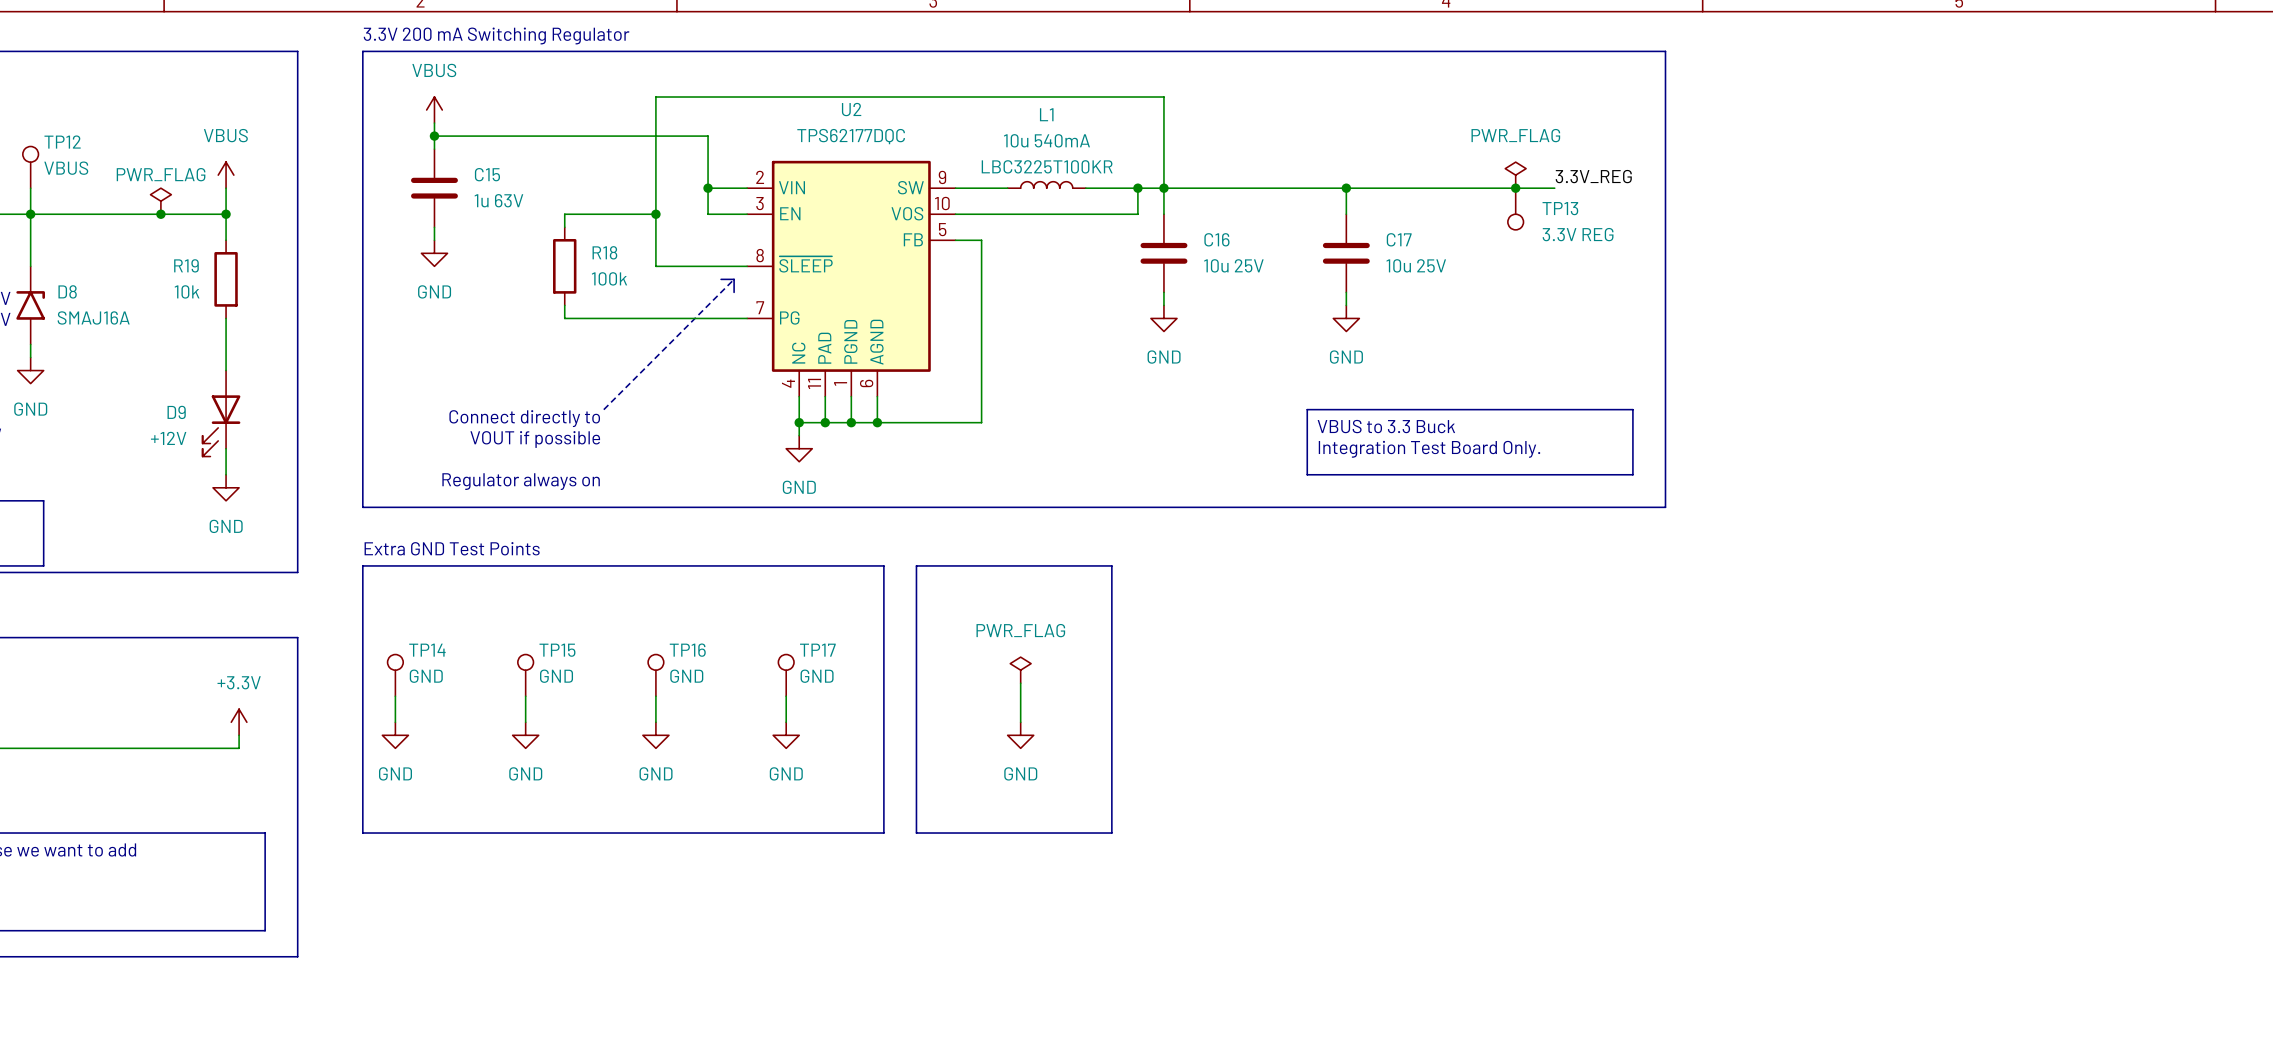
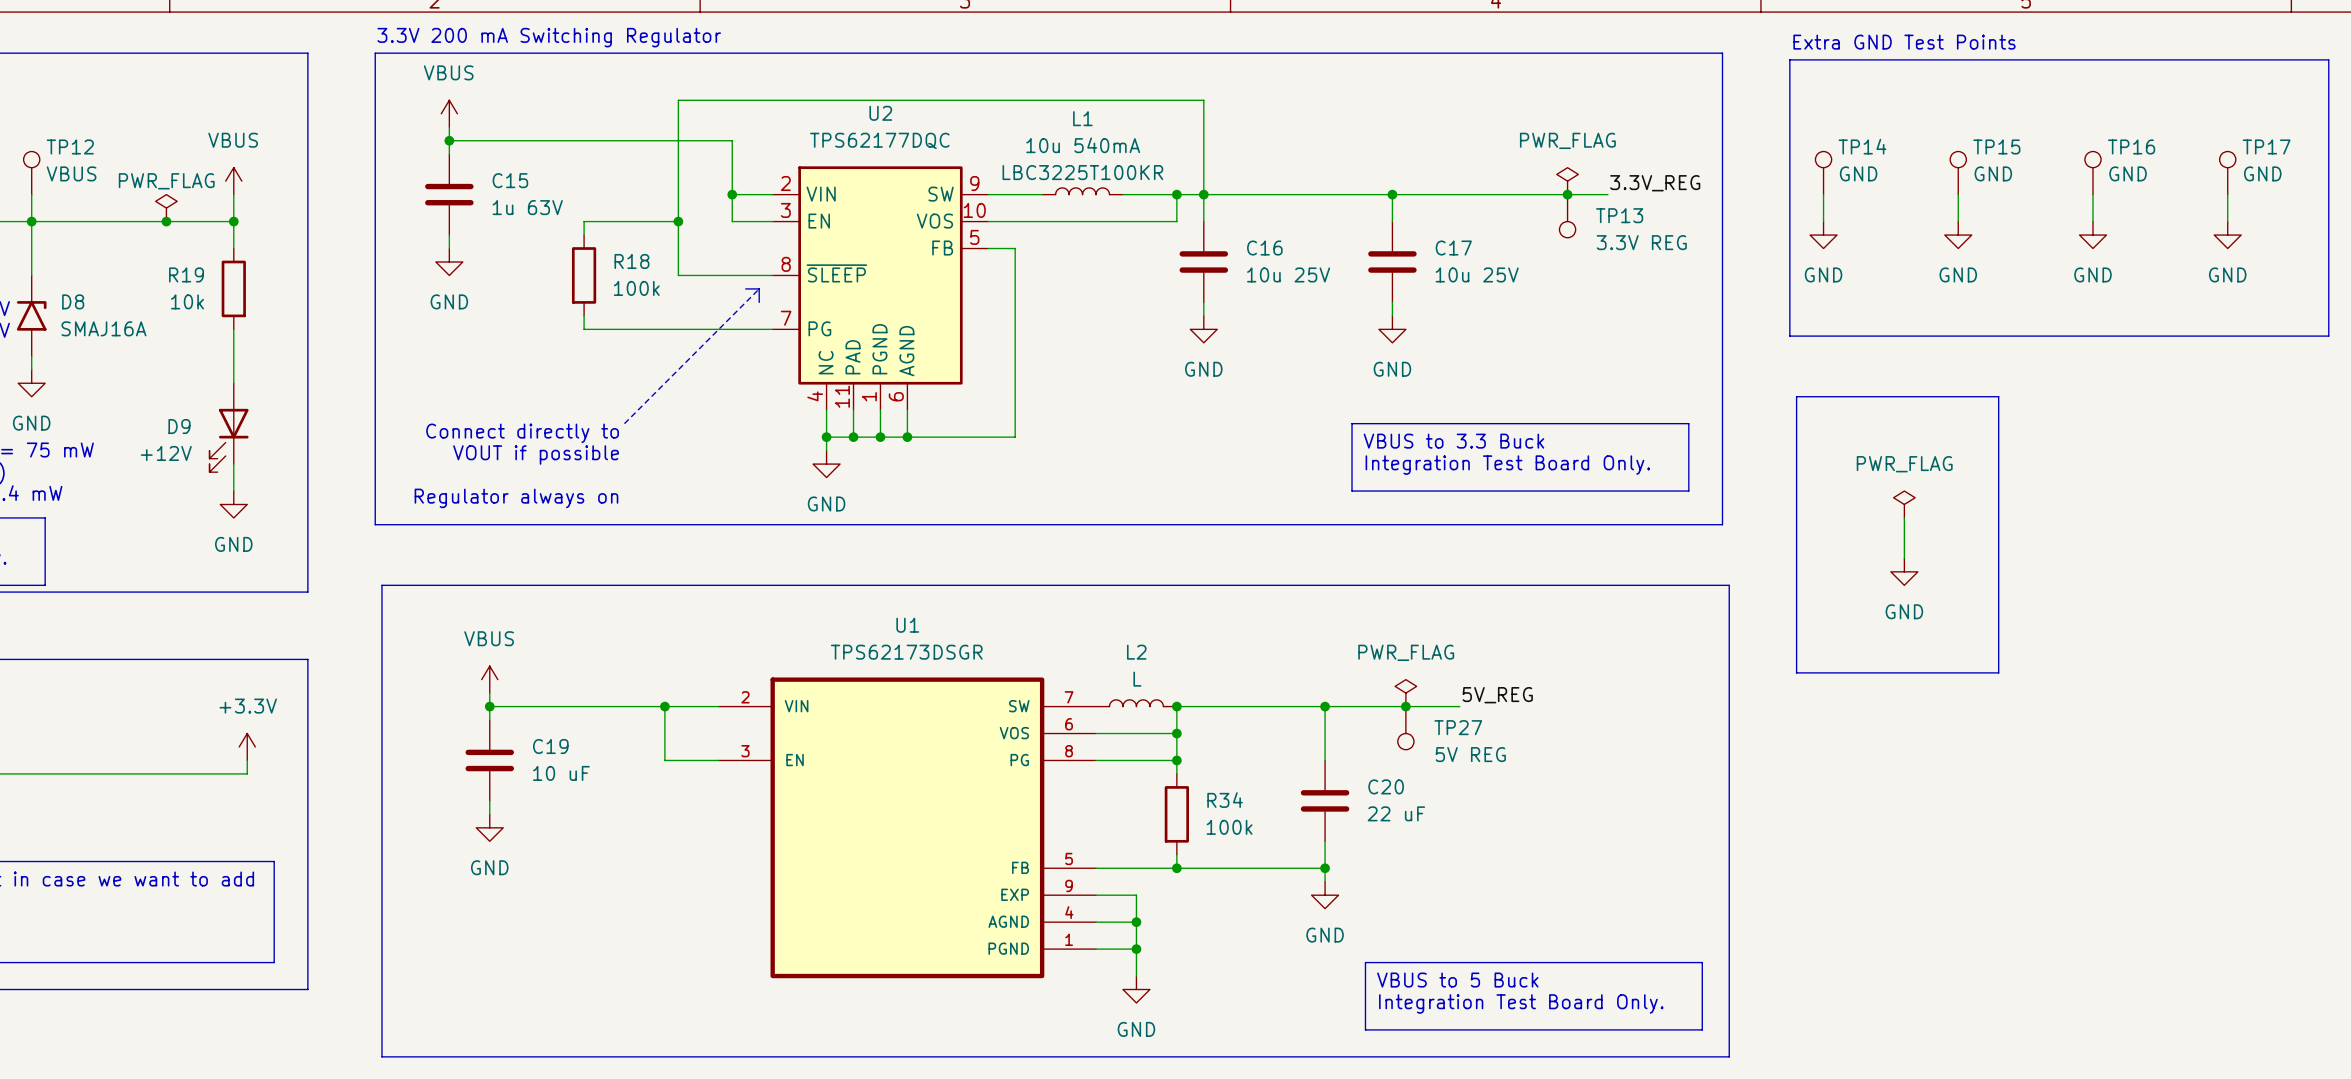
text: none -> Extra GND Test Points (1904, 42)
line: none -> (1789, 59) (2328, 59) (2328, 336) (1789, 336) (1789, 59)
wire: none -> (1823, 194) (1823, 221)
wire: none -> (1958, 194) (1958, 221)
wire: none -> (2092, 194) (2092, 221)
wire: none -> (2227, 194) (2227, 221)
power symbol: none -> GND (1823, 235)
power symbol: none -> GND (1958, 235)
power symbol: none -> GND (2092, 235)
power symbol: none -> GND (2227, 235)
line: none -> (1796, 396) (1998, 396) (1998, 672) (1796, 672) (1796, 396)
power symbol: none -> PWR_FLAG (1904, 504)
wire: none -> (1904, 517) (1904, 558)
text: Extra GND Test Points (452, 548) -> none
power symbol: none -> GND (1904, 571)
line: (369, 565) (362, 565) (362, 833) (883, 833) (883, 565) -> (381, 585) (381, 1056) (1729, 1056) (1729, 585) (1149, 585)
line: (916, 565) (916, 833) (1111, 833) (1111, 565) -> (947, 585) (914, 585)
power symbol: none -> VBUS (489, 679)
power symbol: PWR_FLAG (1020, 670) -> none
power symbol: none -> PWR_FLAG (1405, 693)
label: none -> 5V_REG (1497, 695)
TP14 position: (395, 675) -> (1823, 173)
TP15 position: (525, 675) -> (1958, 173)
TP16 position: (655, 675) -> (2092, 173)
TP17 position: (786, 675) -> (2227, 173)
L2: none -> L (1136, 703)
wire: none -> (489, 706) (718, 706)
junction: none -> (489, 706)
wire: none -> (664, 706) (664, 760) (718, 760)
junction: none -> (664, 706)
wire: (1020, 683) (1020, 722) -> none
junction: none -> (1176, 706)
wire: none -> (1325, 706) (1325, 760)
junction: none -> (1325, 706)
junction: none -> (1405, 706)
wire: none -> (1459, 706) (1176, 706) (1176, 773)
wire: (395, 696) (395, 722) -> none
wire: (525, 696) (525, 722) -> (489, 693) (489, 720)
wire: (655, 696) (655, 722) -> none
TP27: none -> 5V REG (1405, 728)
wire: none -> (1096, 733) (1176, 733)
junction: none -> (1176, 733)
power symbol: GND (395, 735) -> none
C19: none -> 10 uF (489, 760)
power symbol: GND (525, 735) -> none
power symbol: GND (655, 735) -> none
power symbol: GND (786, 735) -> none
power symbol: GND (1020, 735) -> none
wire: none -> (1096, 760) (1176, 760)
junction: none -> (1176, 760)
wire: none -> (489, 800) (489, 814)
C20: none -> 22 uF (1325, 800)
R34: none -> 100k (1176, 814)
power symbol: none -> GND (489, 827)
U1: none -> TPS62173DSGR (907, 827)
wire: none -> (1325, 841) (1325, 881)
wire: none -> (1176, 854) (1176, 868)
wire: none -> (1096, 868) (1325, 868)
junction: none -> (1176, 868)
junction: none -> (1325, 868)
wire: none -> (1096, 895) (1136, 895) (1136, 976)
power symbol: none -> GND (1325, 895)
wire: none -> (1096, 922) (1136, 922)
junction: none -> (1136, 922)
wire: none -> (1096, 949) (1136, 949)
junction: none -> (1136, 949)
line: none -> (1365, 962) (1702, 962) (1702, 1029) (1365, 1029) (1365, 962)
text: none -> VBUS to 5 Buck (1457, 980)
power symbol: none -> GND (1136, 989)
text: none -> Integration Test Board Only. (1521, 1003)

